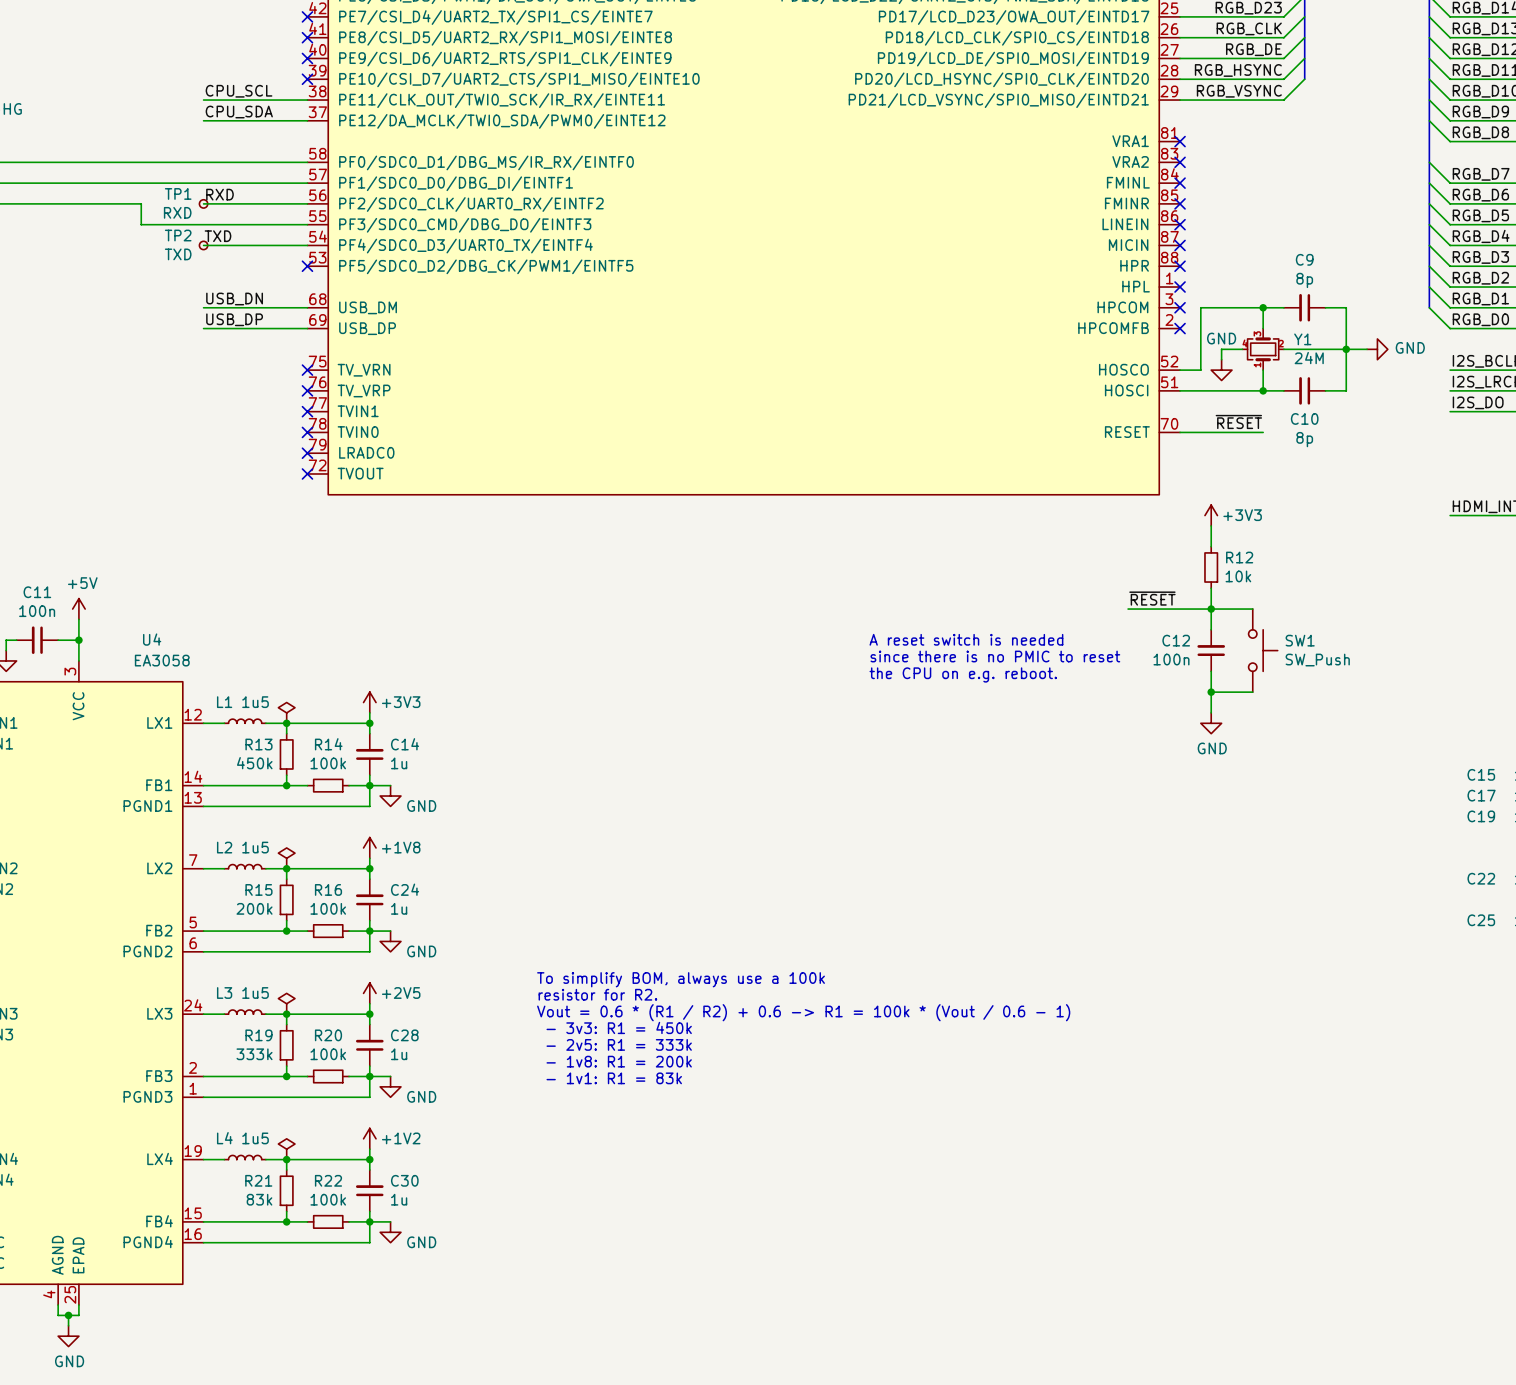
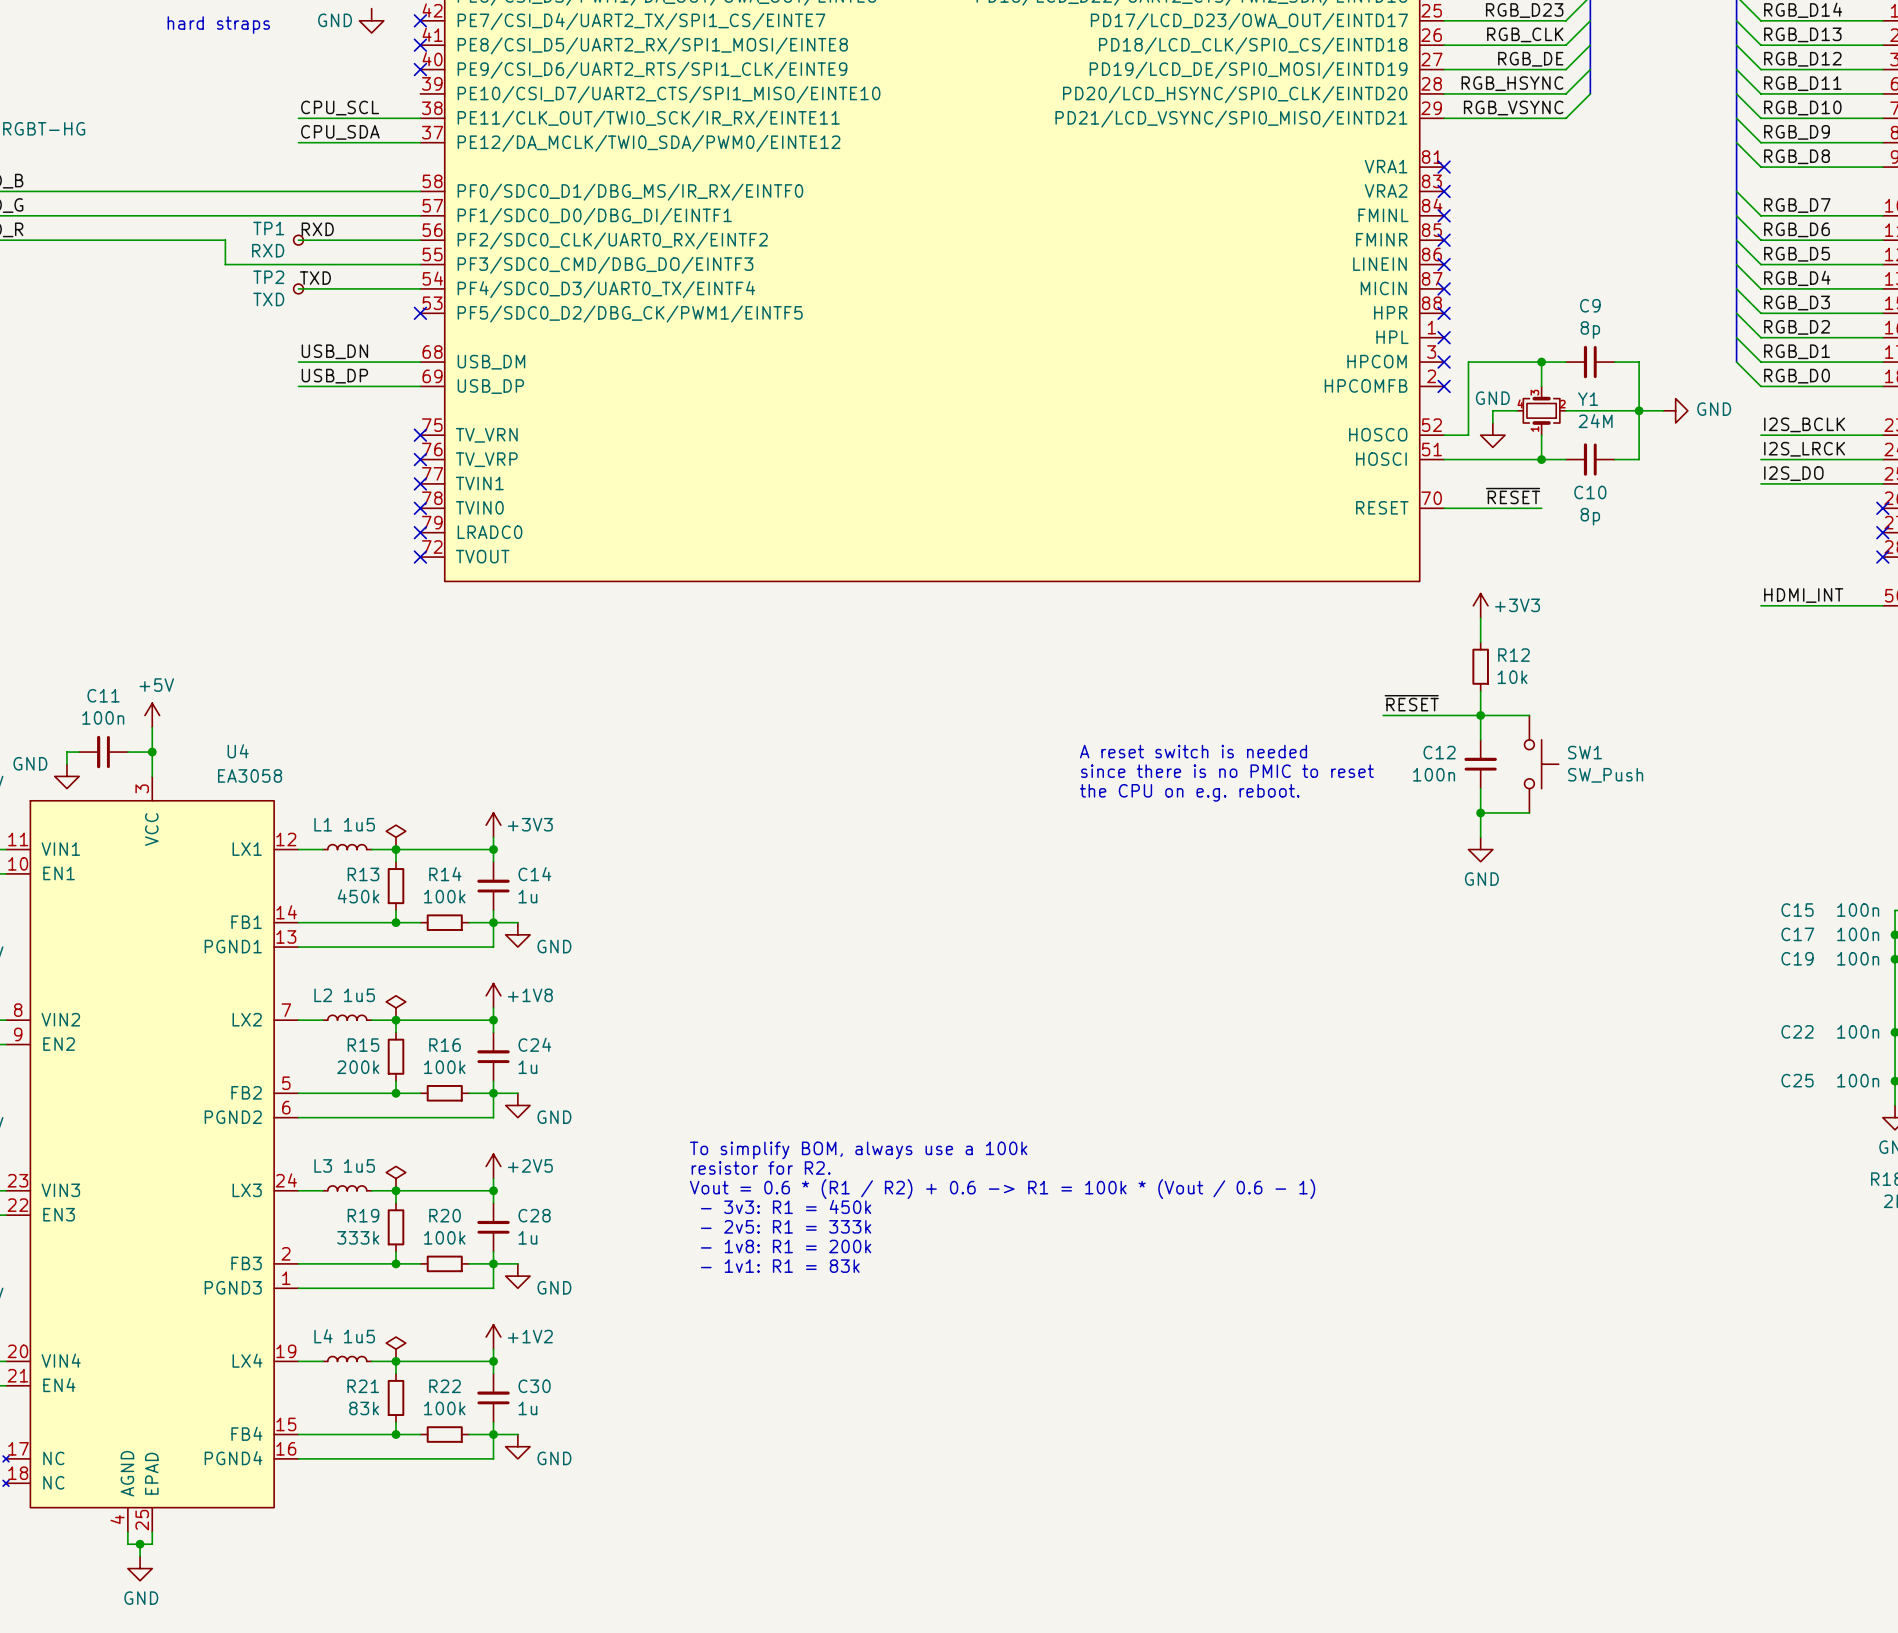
power symbol: none -> GND (371, 20)
text: none -> hard straps (218, 25)
no-connect mark: (307, 79) -> none

